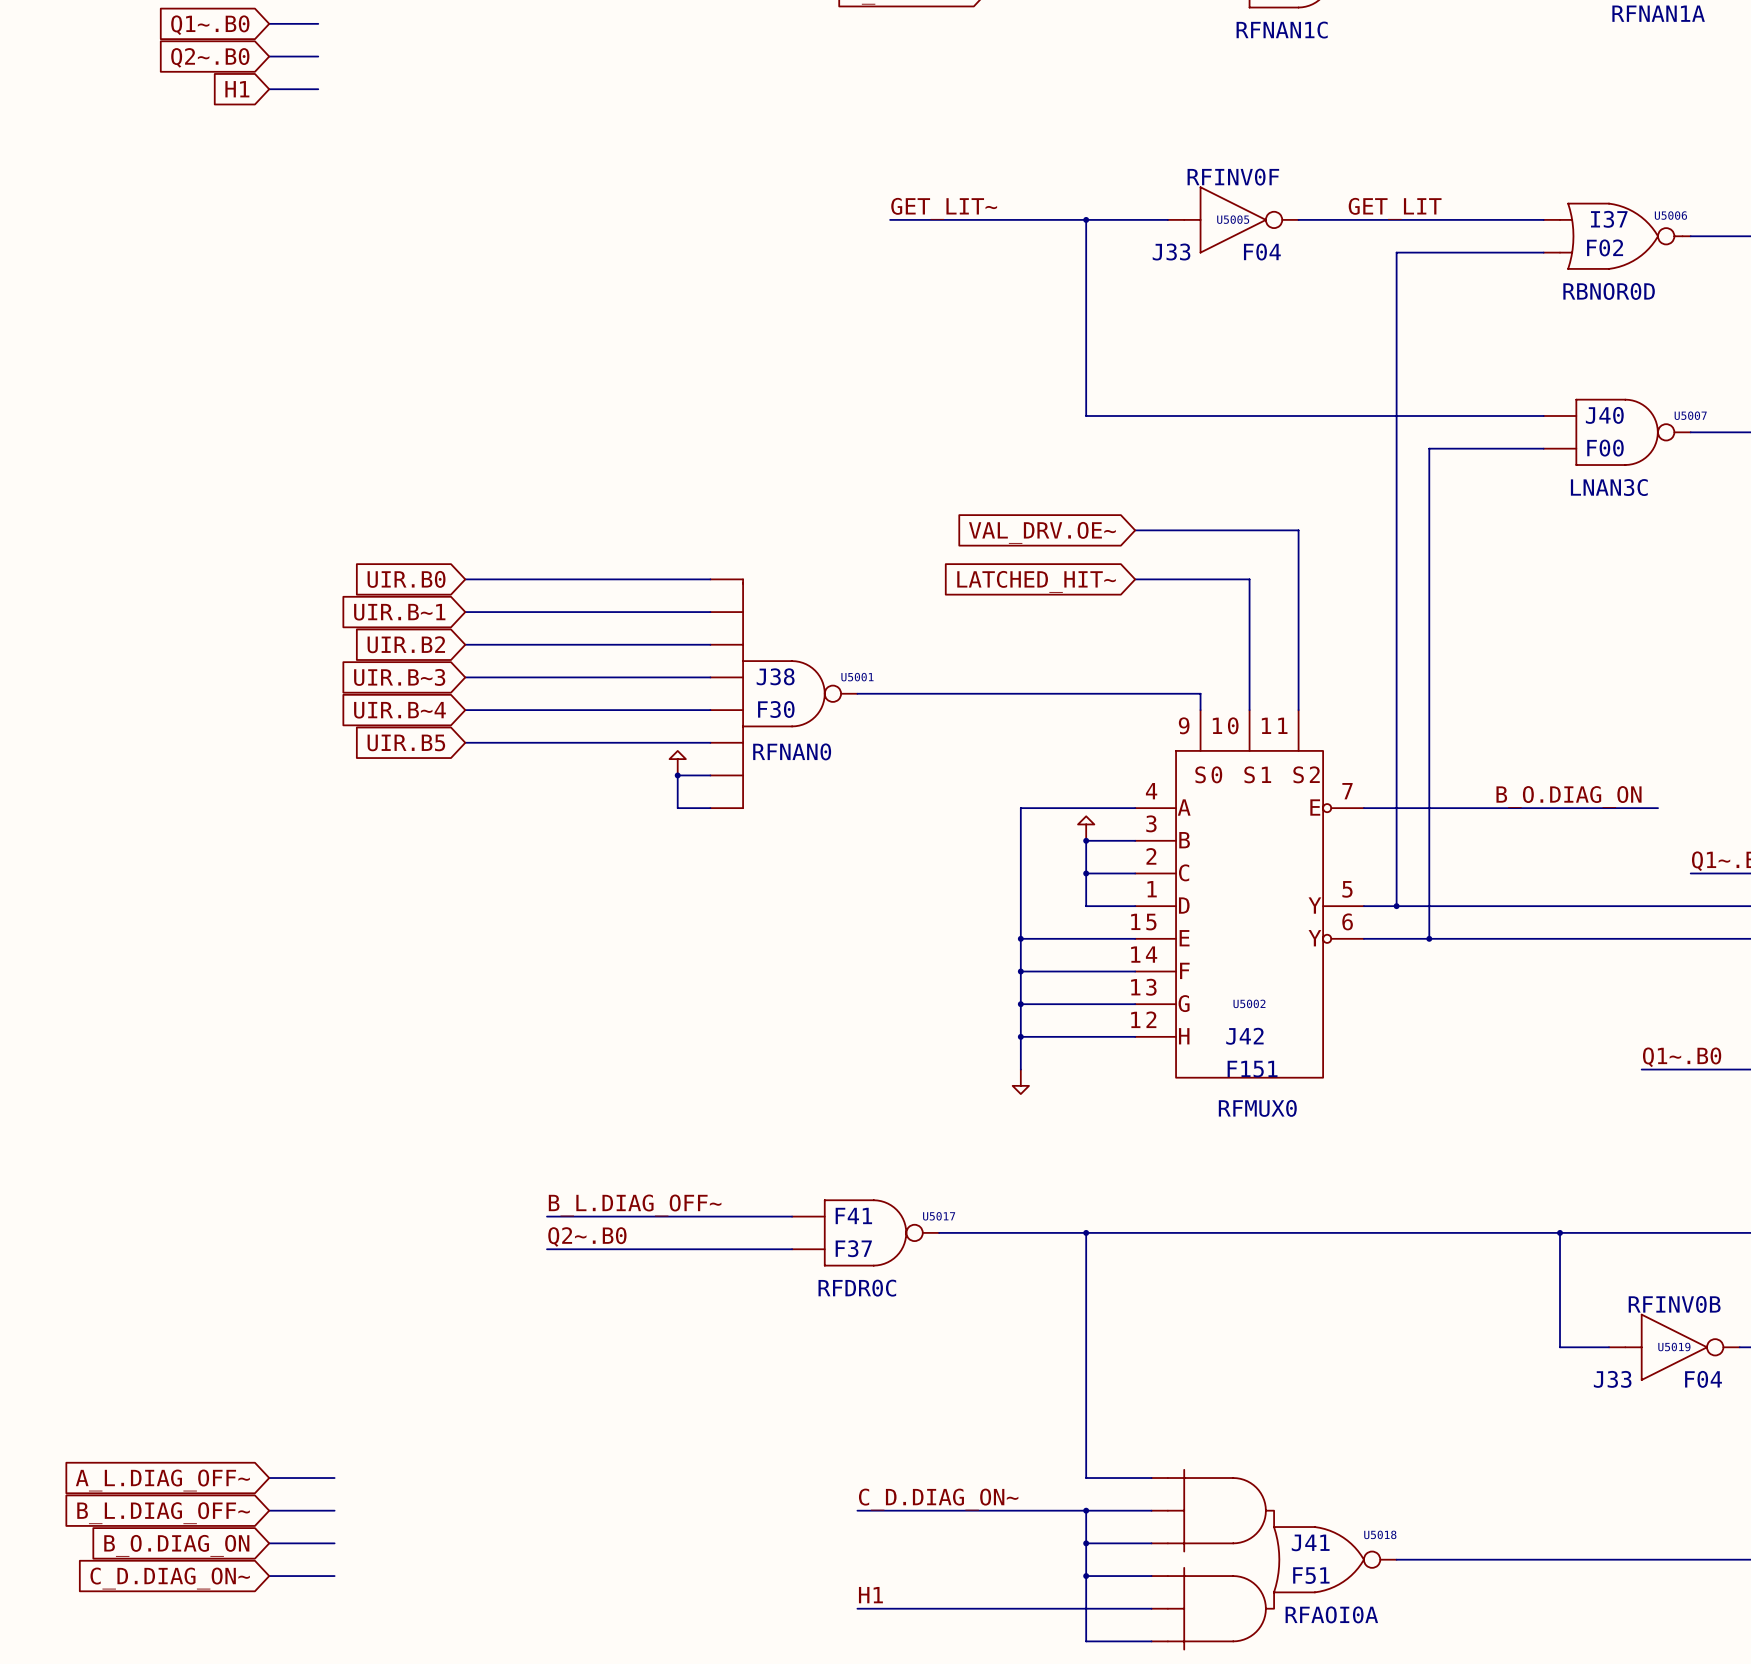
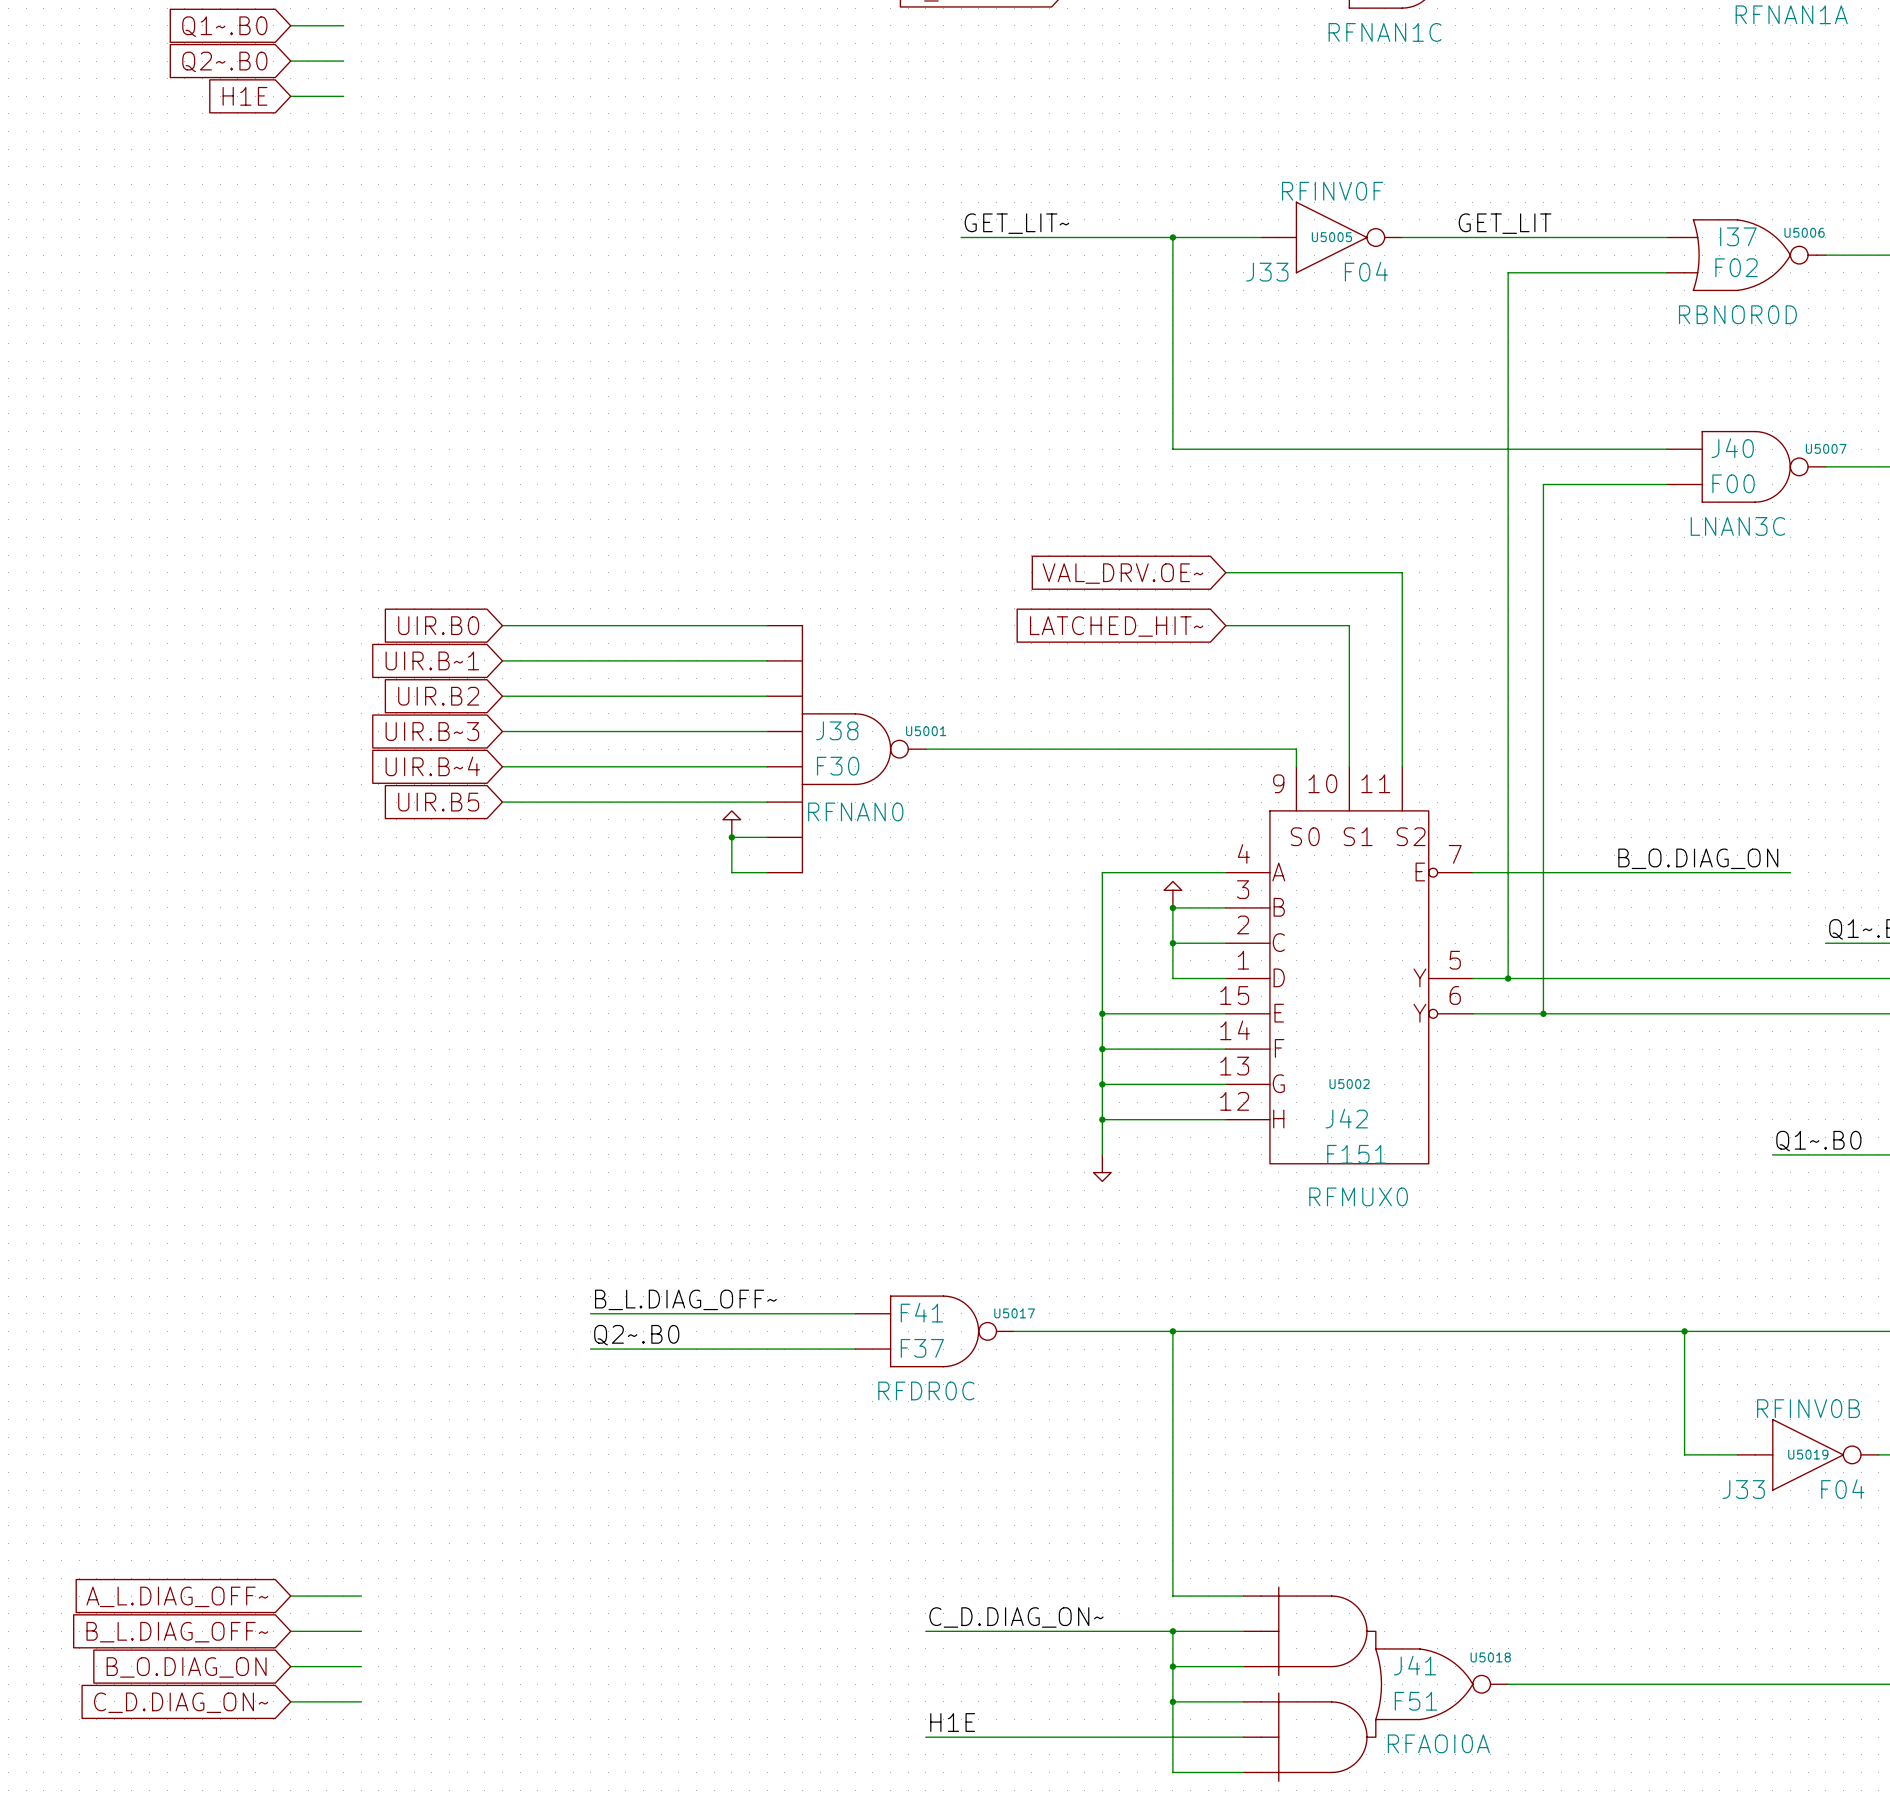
global label: H1 (237, 89) -> H1E (244, 96)
label: H1 (870, 1595) -> H1E (952, 1722)

